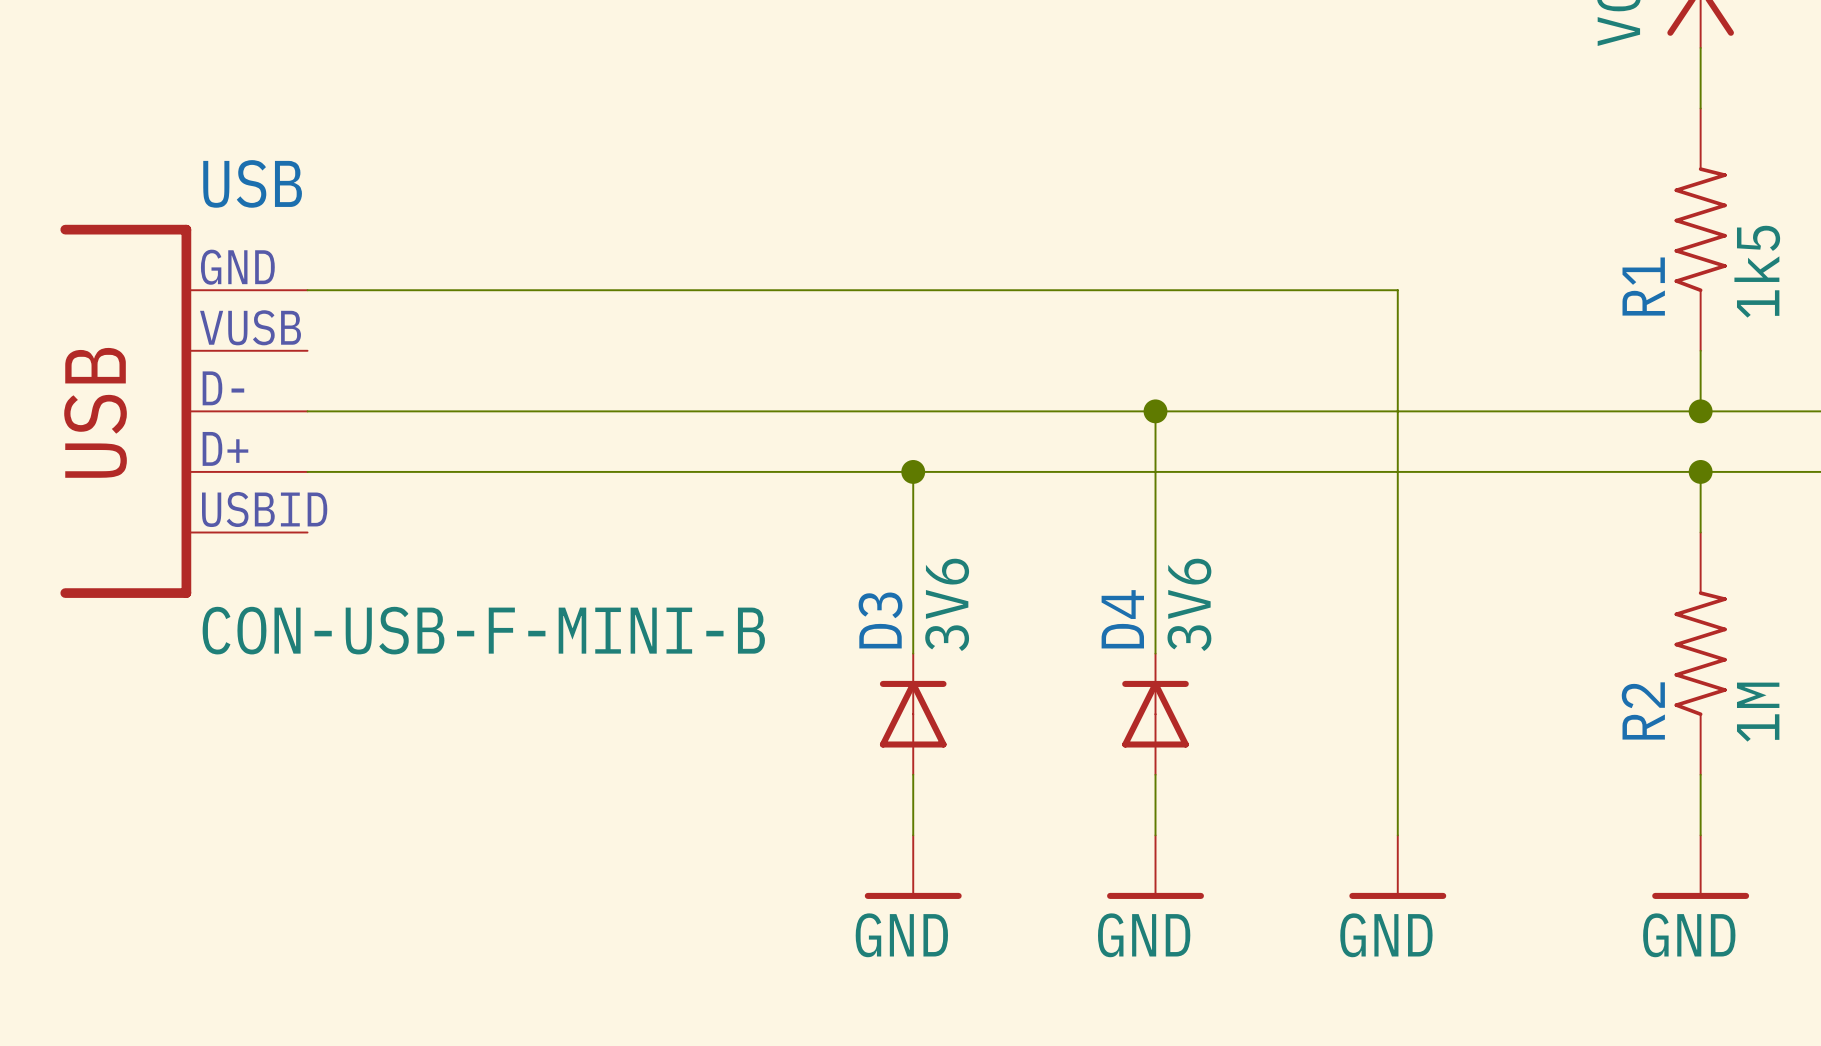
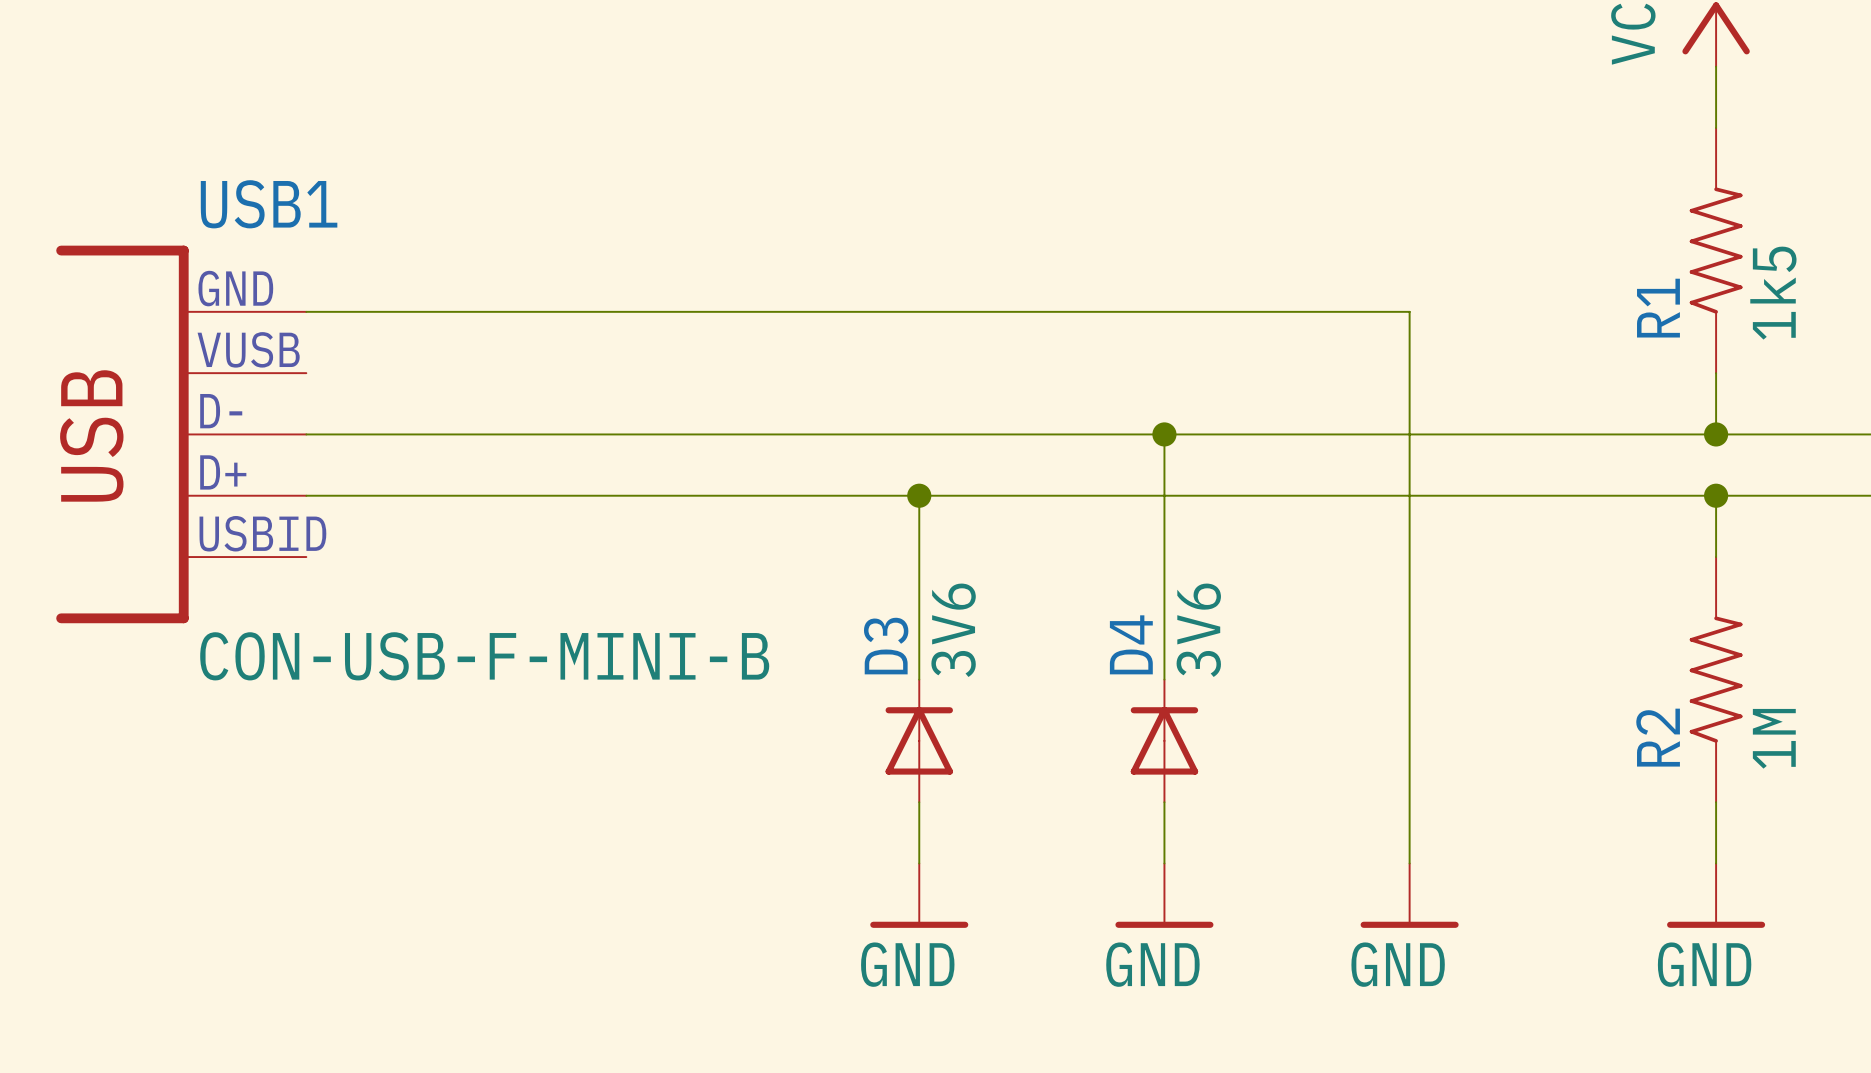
USB name: USB (252, 183) -> USB1 (269, 204)

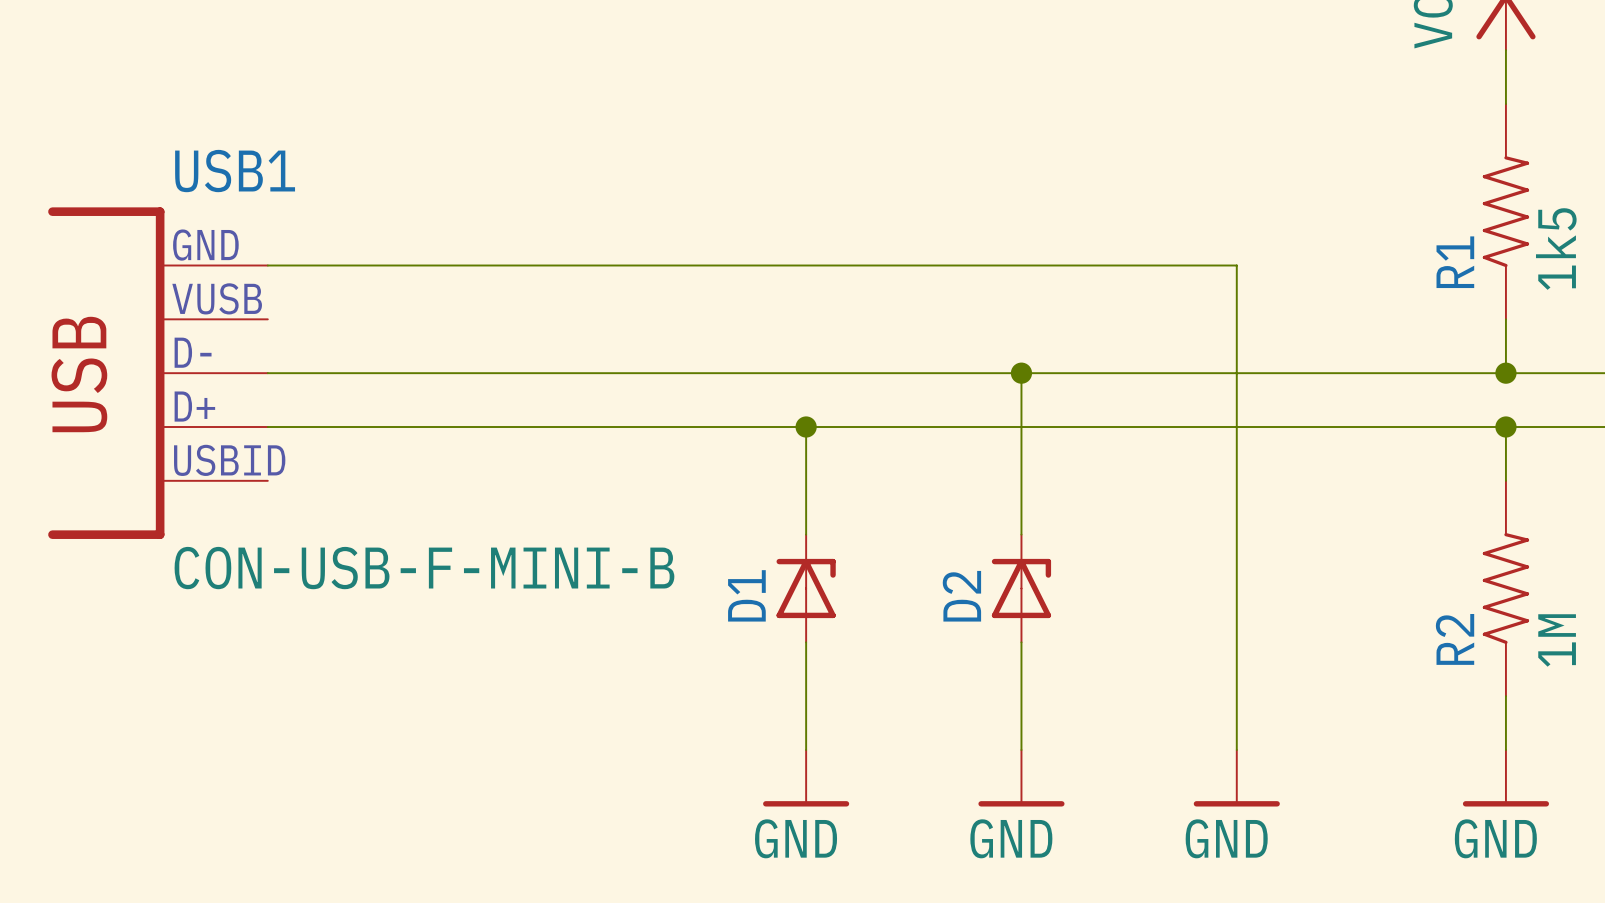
D1: none -> (806, 588)
D2: none -> (1021, 588)
D3: 3V6 (919, 740) -> none
D4: 3V6 (1164, 740) -> none

